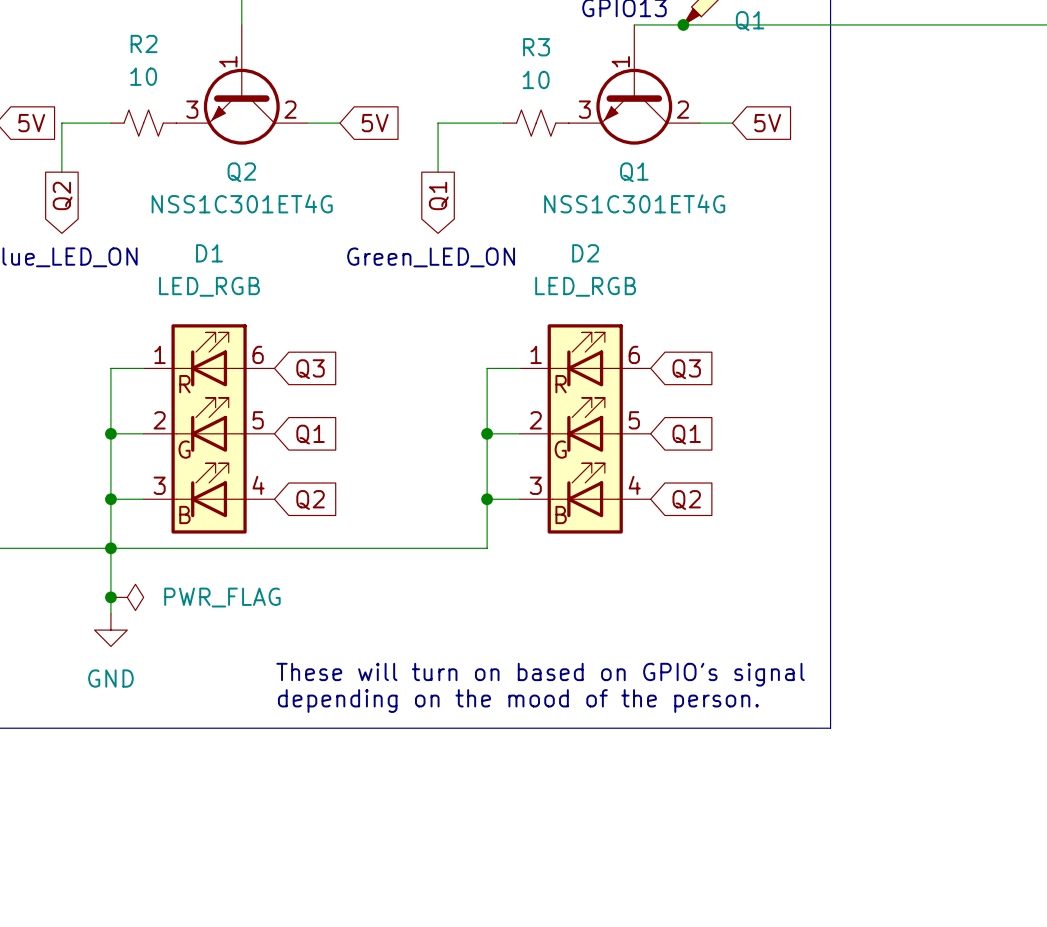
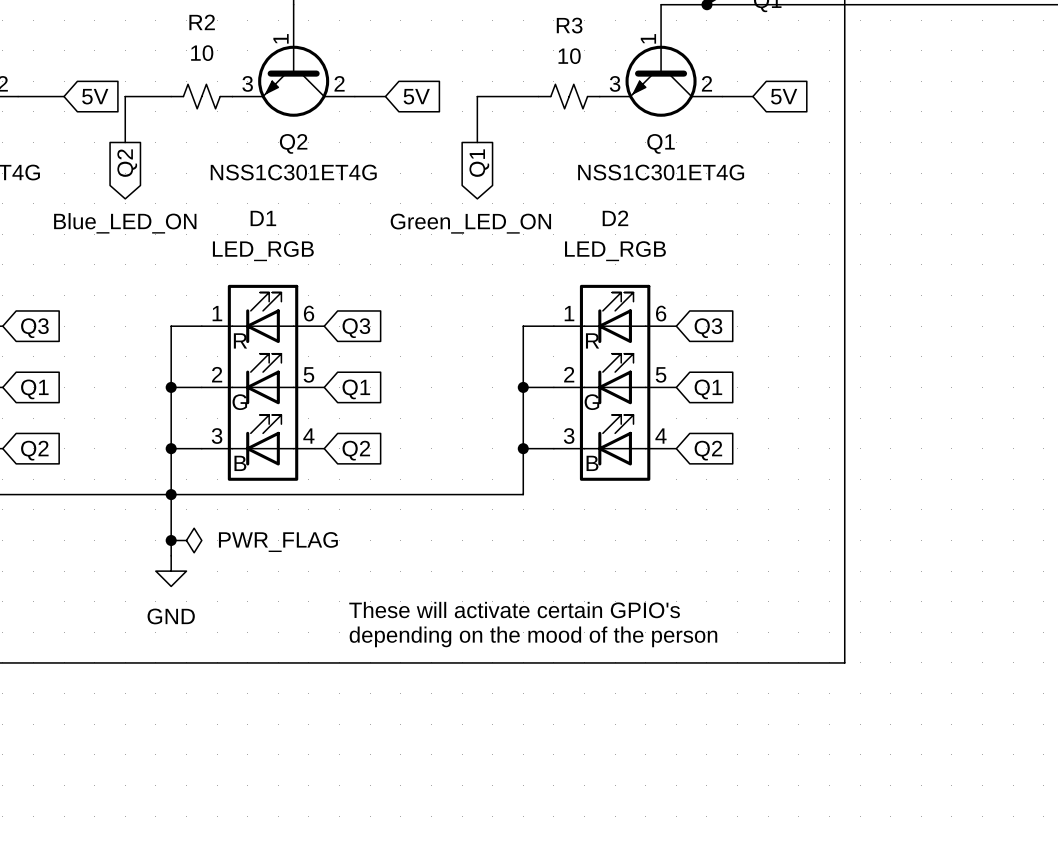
text: none -> These will activate certain GPIO's (514, 610)
text: These will turn on based on GPIO's signal (540, 674) -> none
text: depending on the mood of the person. (518, 701) -> depending on the mood of the person (533, 636)

